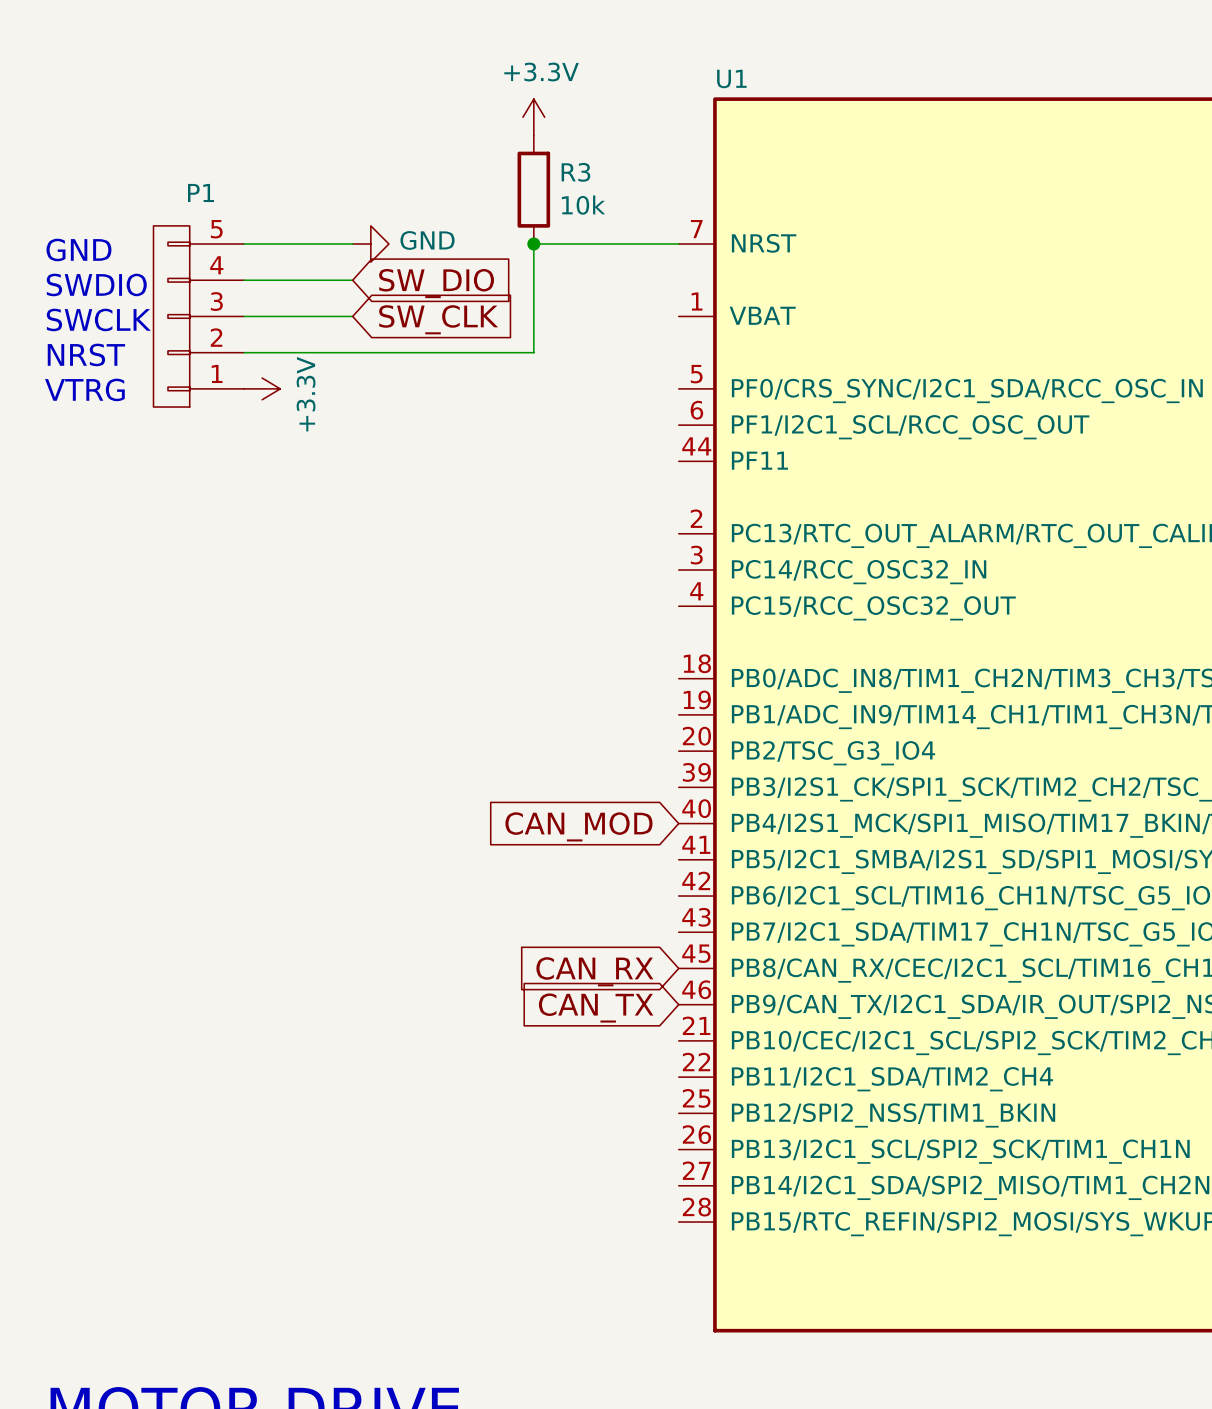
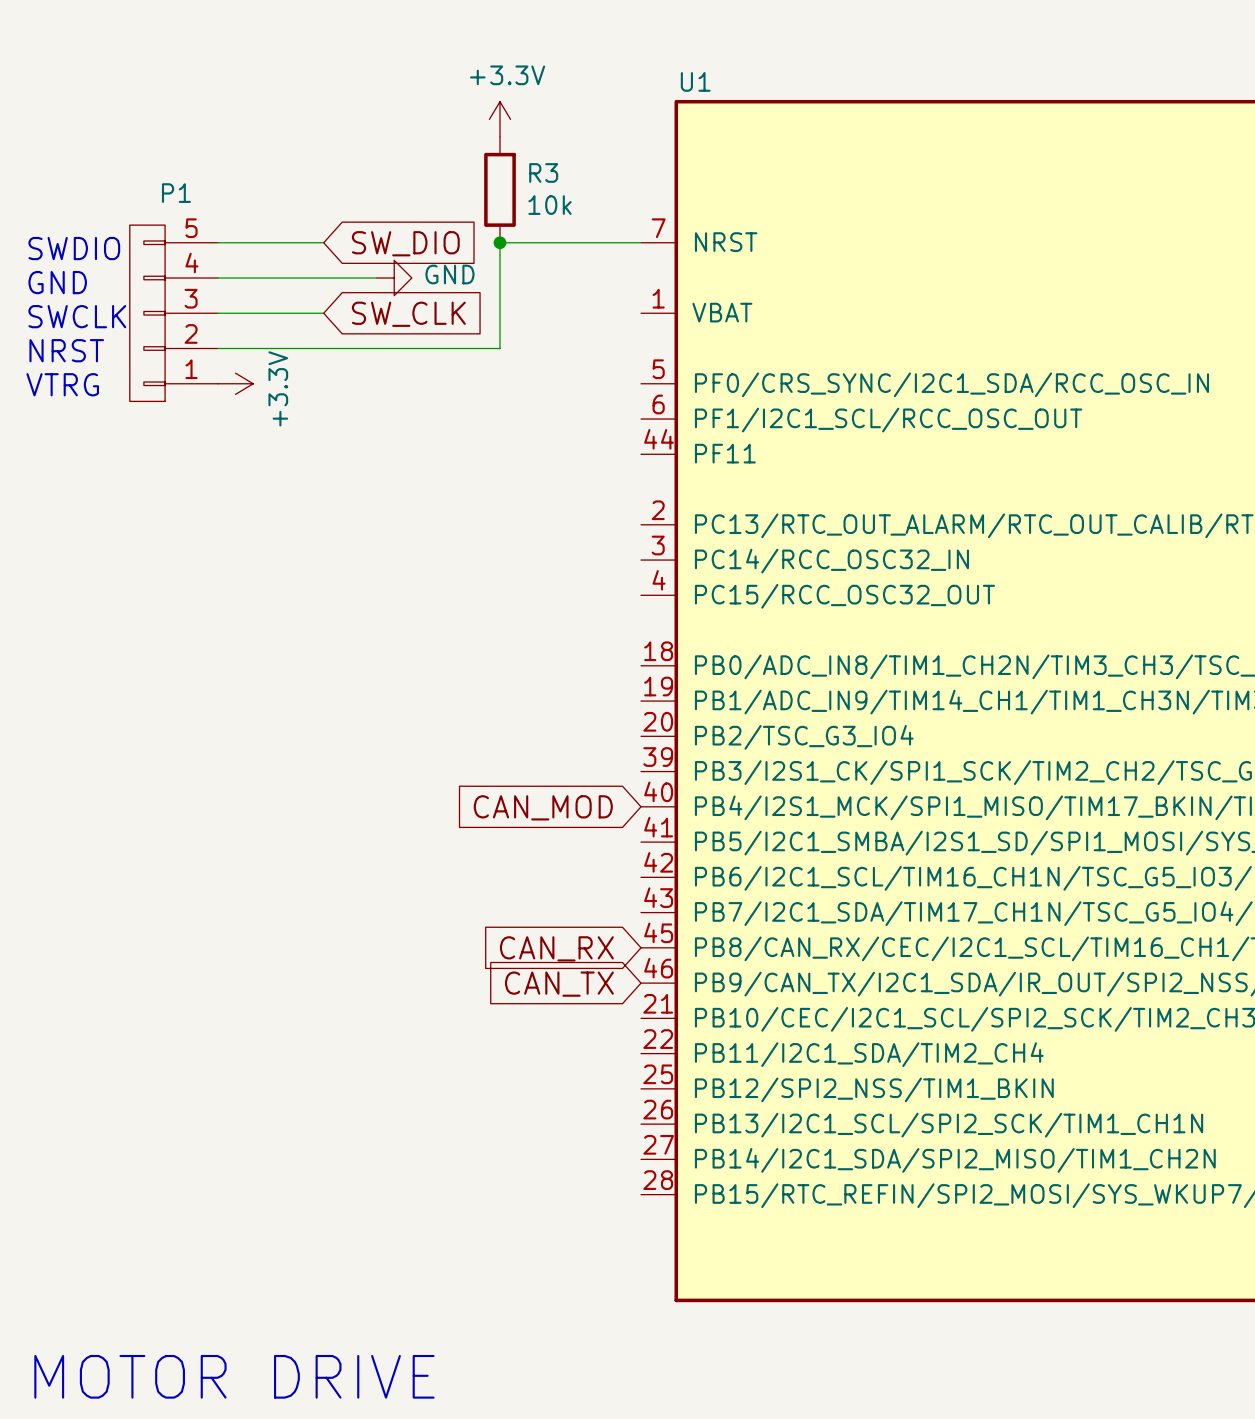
power symbol position: GND (370, 244) -> GND (394, 278)
text: GND (78, 249) -> SWDIO (74, 248)
wire: none -> (323, 278) (376, 278)
global label position: SW_DIO (436, 283) -> SW_DIO (405, 243)
text: SWDIO (96, 284) -> GND (57, 282)

